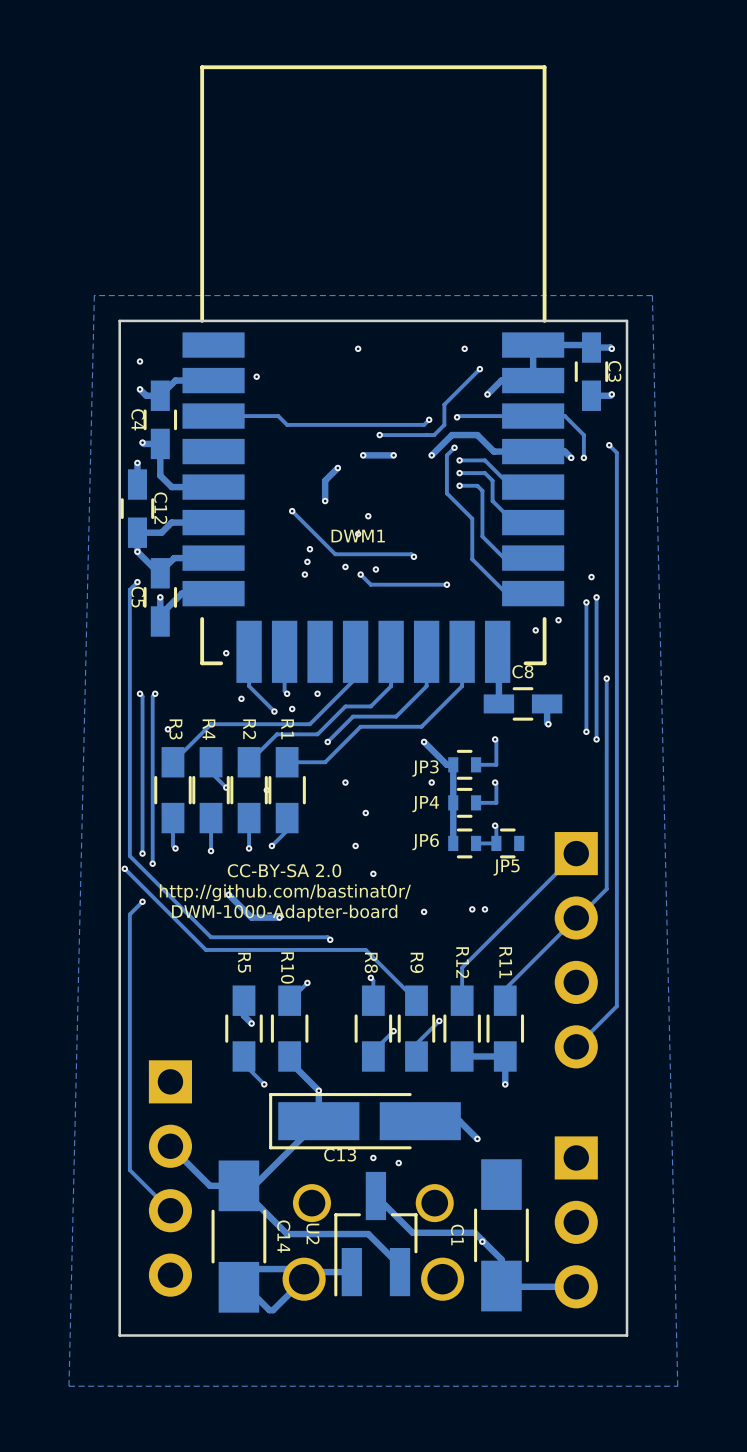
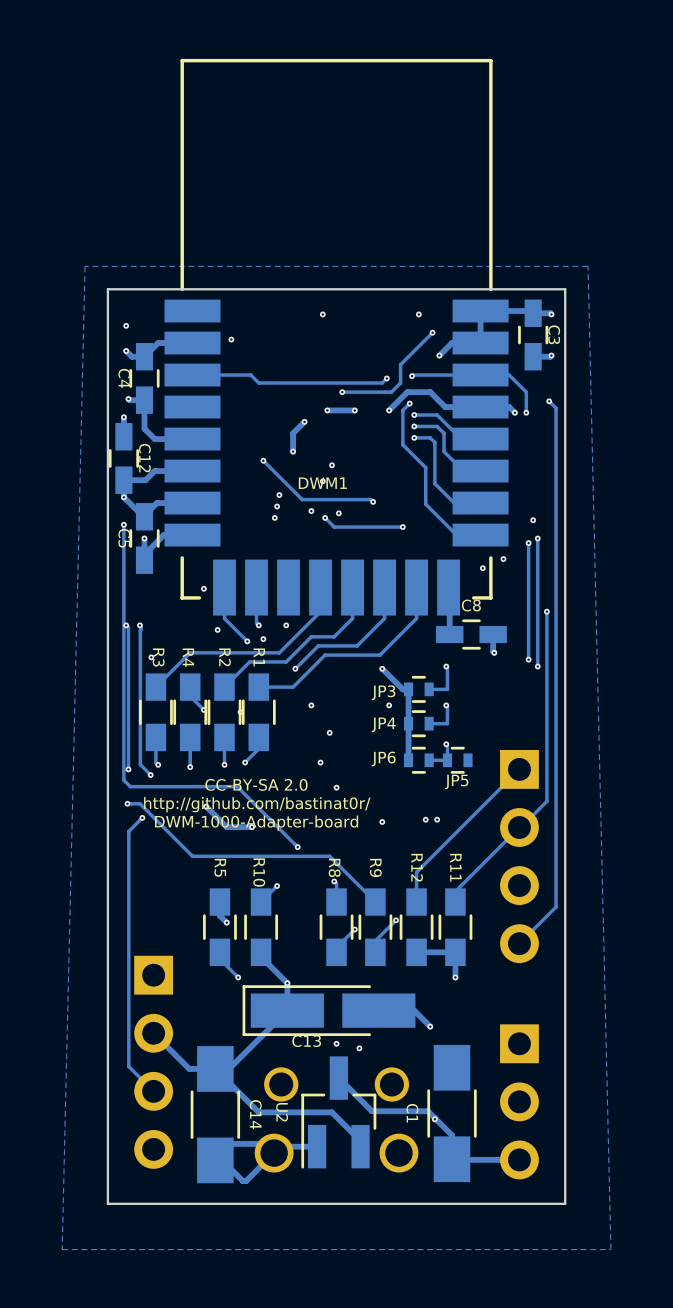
track: (137, 582) (129, 589) (129, 856) (211, 937) (327, 937) -> (123, 524) (123, 780) (130, 786) (237, 786) (295, 844)
track: (155, 693) (152, 696) (152, 863) -> none
track: none -> (141, 625) (140, 764) (150, 775)
via: none -> (150, 775)
via: (152, 863) -> none
track: (124, 868) (205, 949) (213, 949) -> (127, 803) (140, 803) (192, 856)
via: (124, 868) -> none
via: none -> (127, 803)
track: (142, 901) (129, 914) (129, 1170) (142, 1183) -> (142, 817) (128, 831) (128, 1066)
via: (142, 901) -> none
via: none -> (142, 817)

